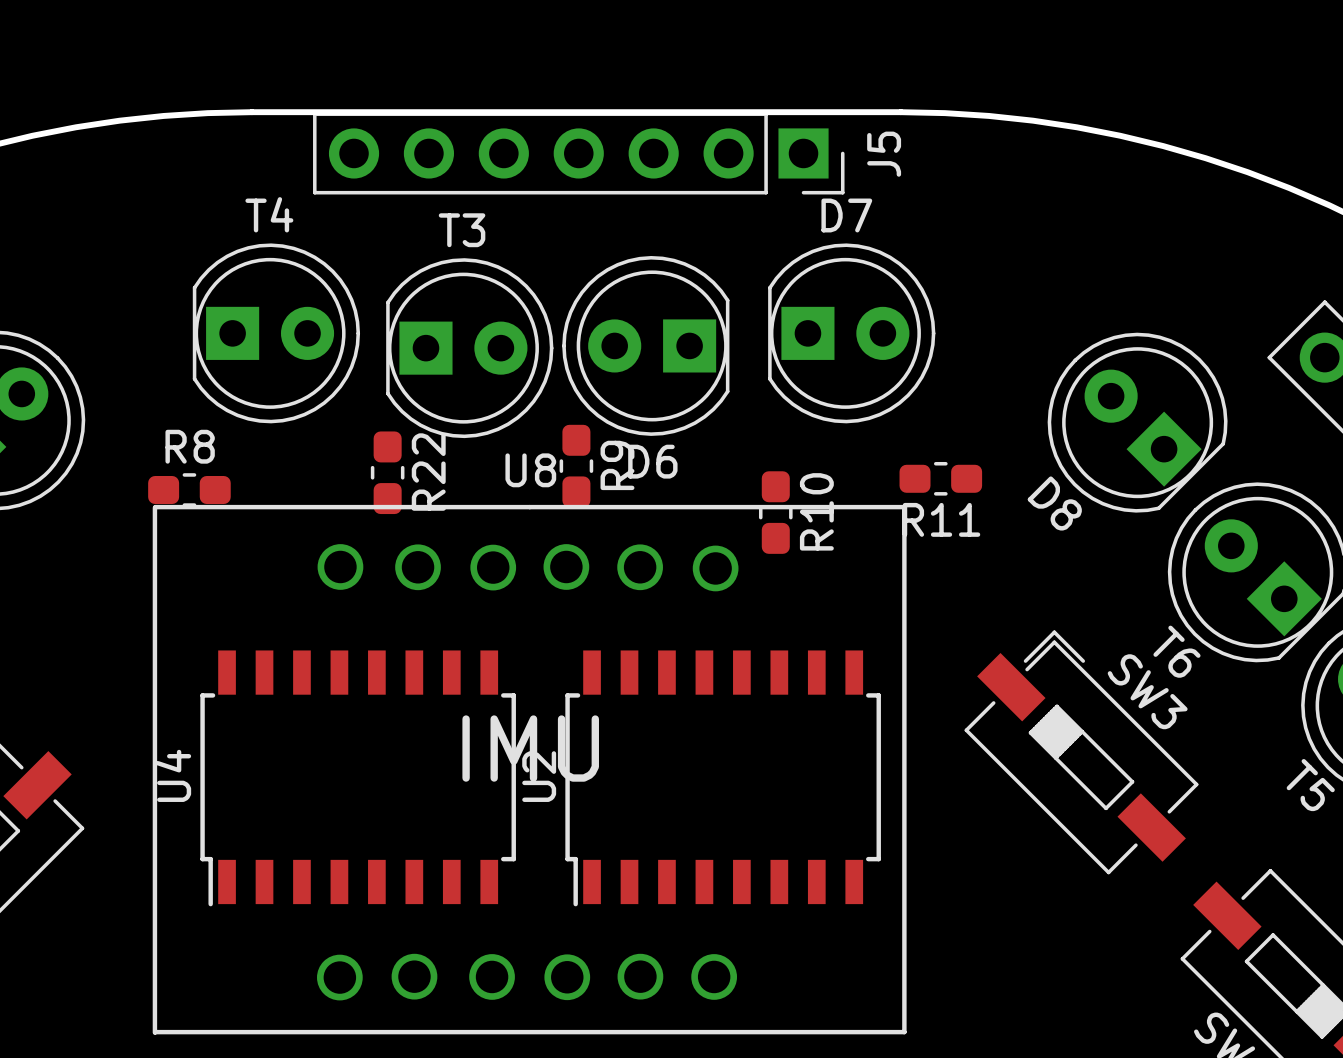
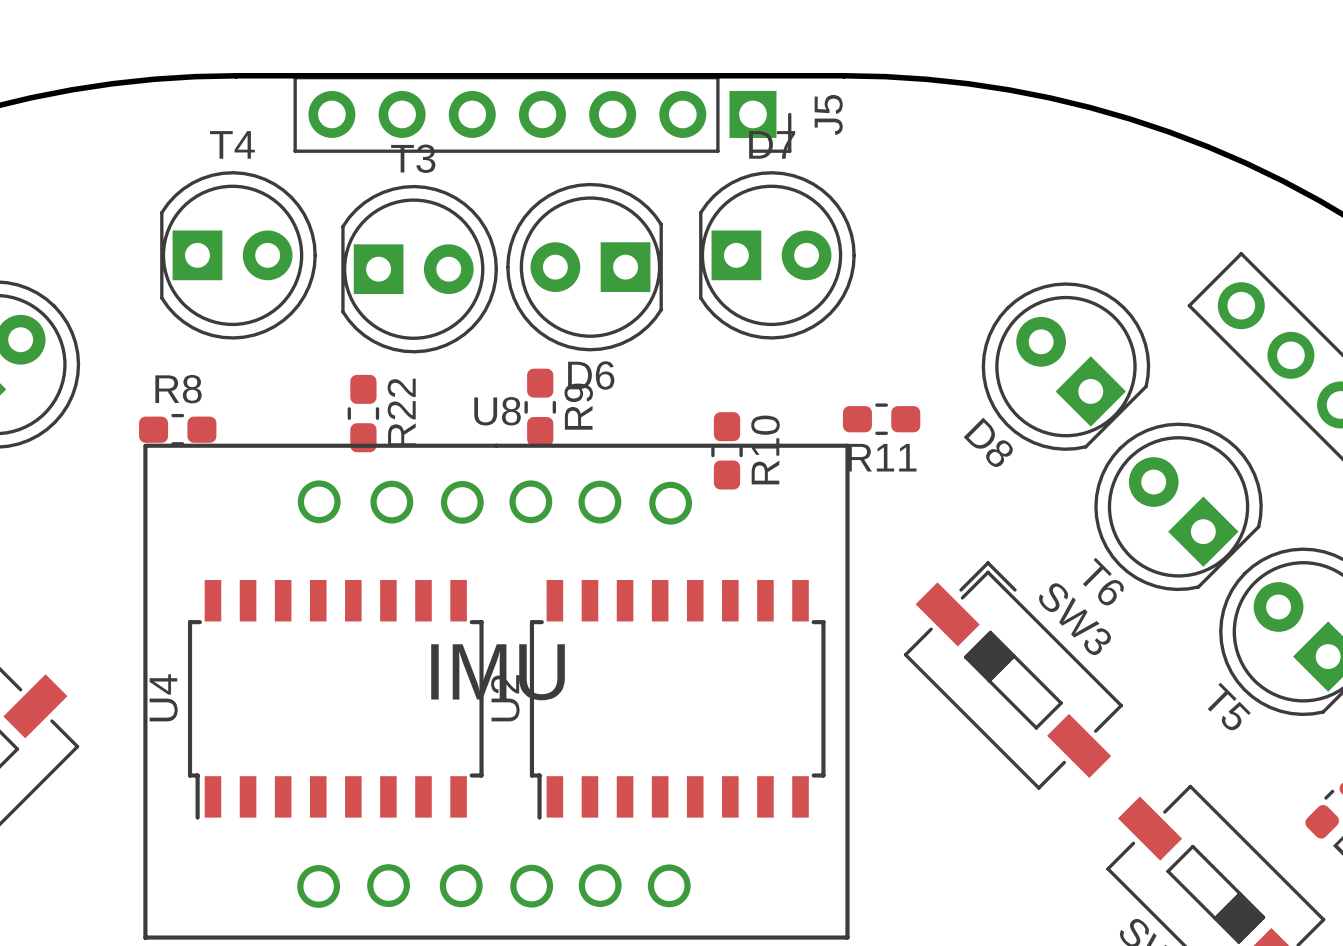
T4 position: (276, 333) -> (238, 255)
D7 position: (851, 333) -> (777, 255)
D6 position: (645, 345) -> (584, 267)
T3 position: (469, 348) -> (419, 269)

